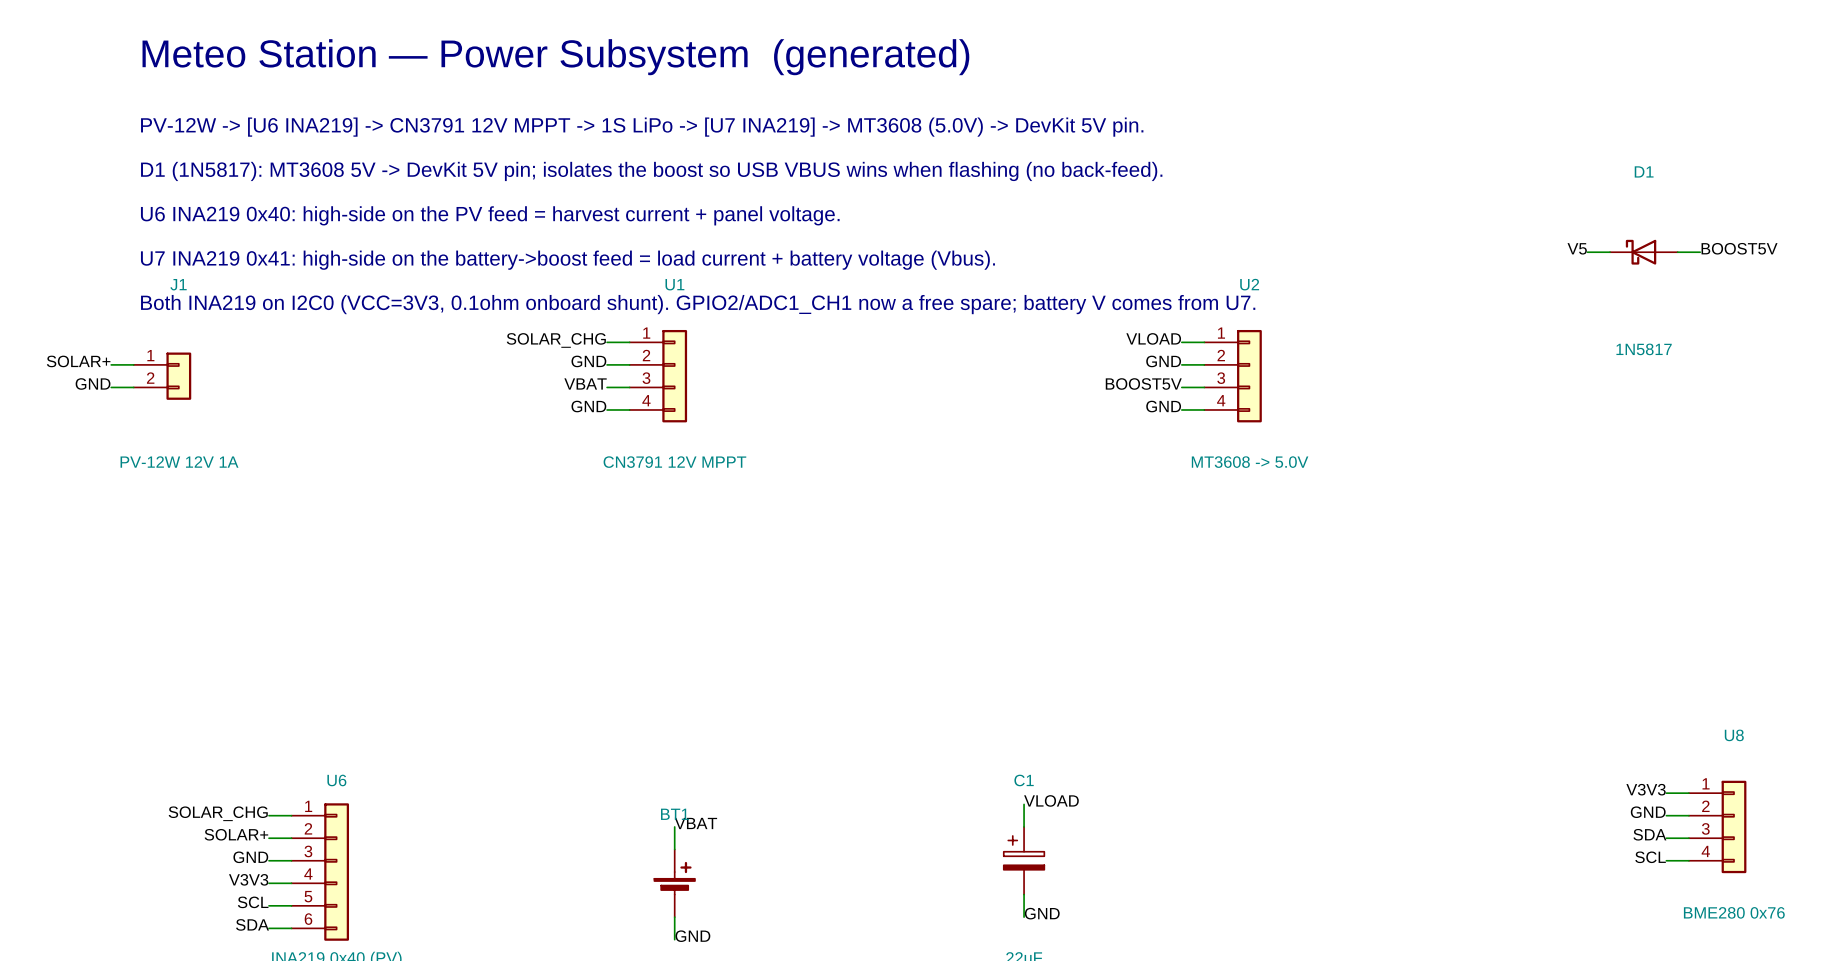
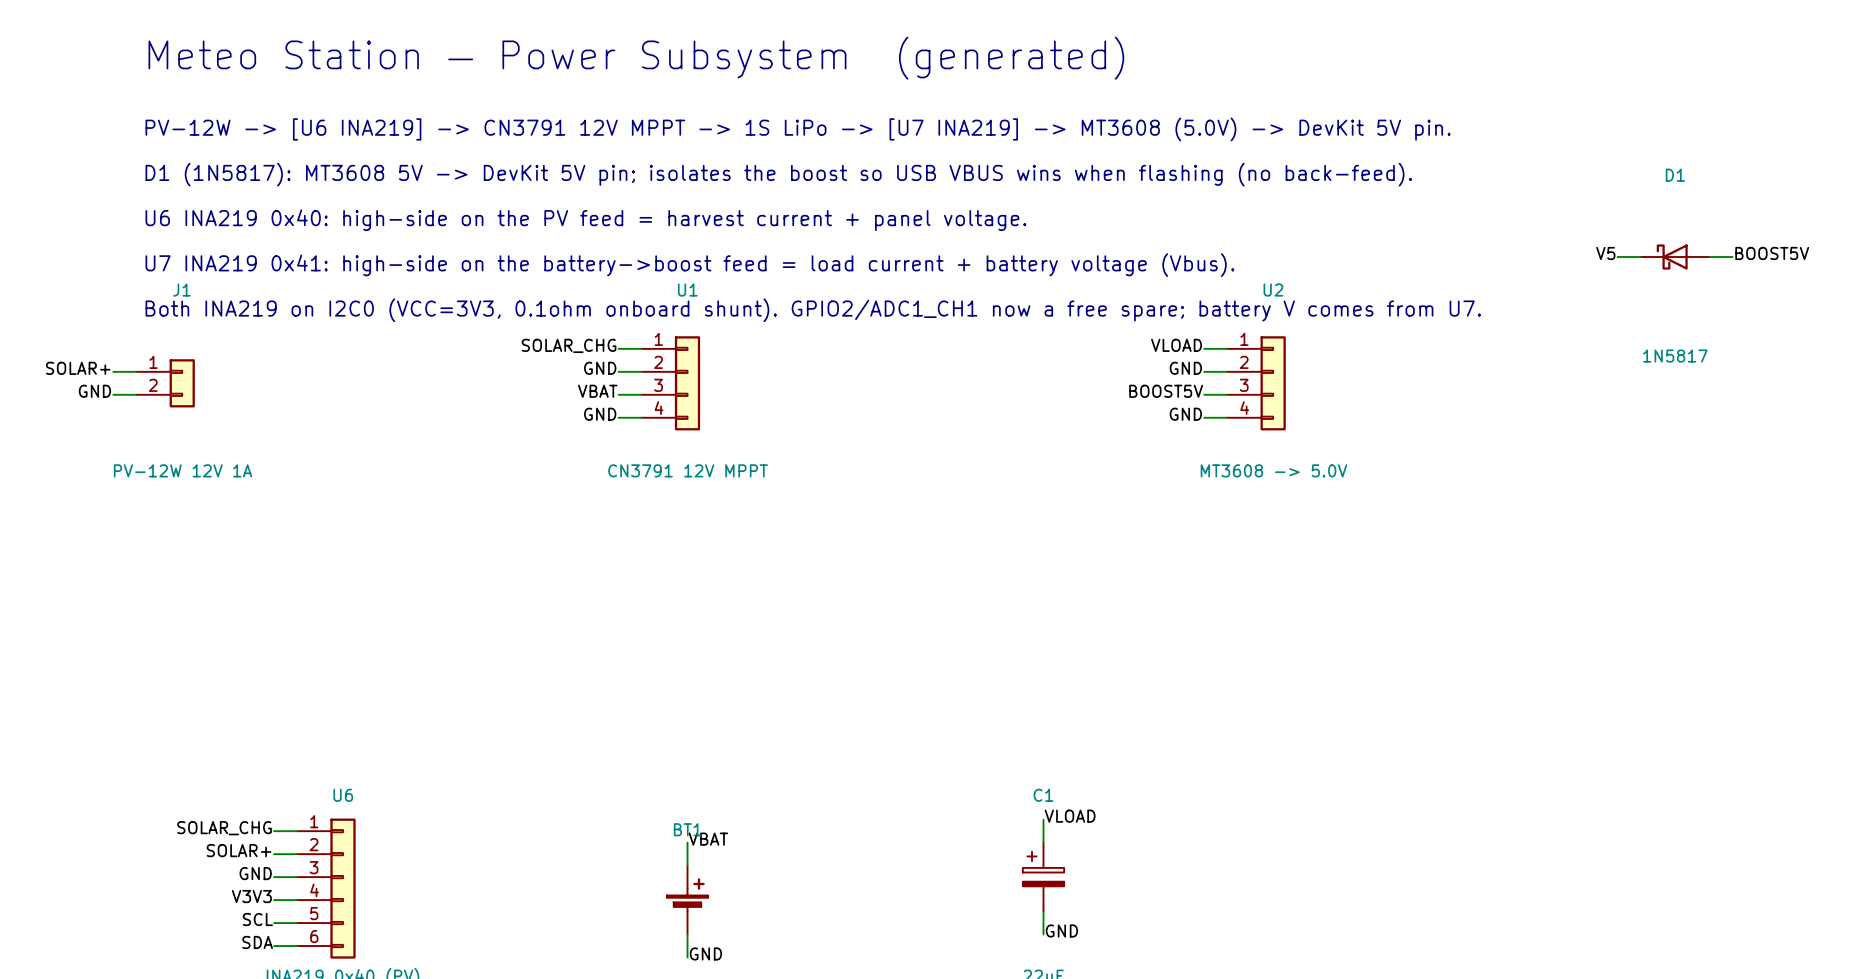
label: V3V3 (1646, 789) -> none
wire: (1666, 793) (1688, 793) -> none
label: GND (1648, 812) -> none
wire: (1666, 815) (1688, 815) -> none
U8: BME280 0x76 (1717, 826) -> none
label: SDA (1649, 834) -> none
wire: (1666, 838) (1688, 838) -> none
label: SCL (1650, 857) -> none
wire: (1666, 860) (1688, 860) -> none

